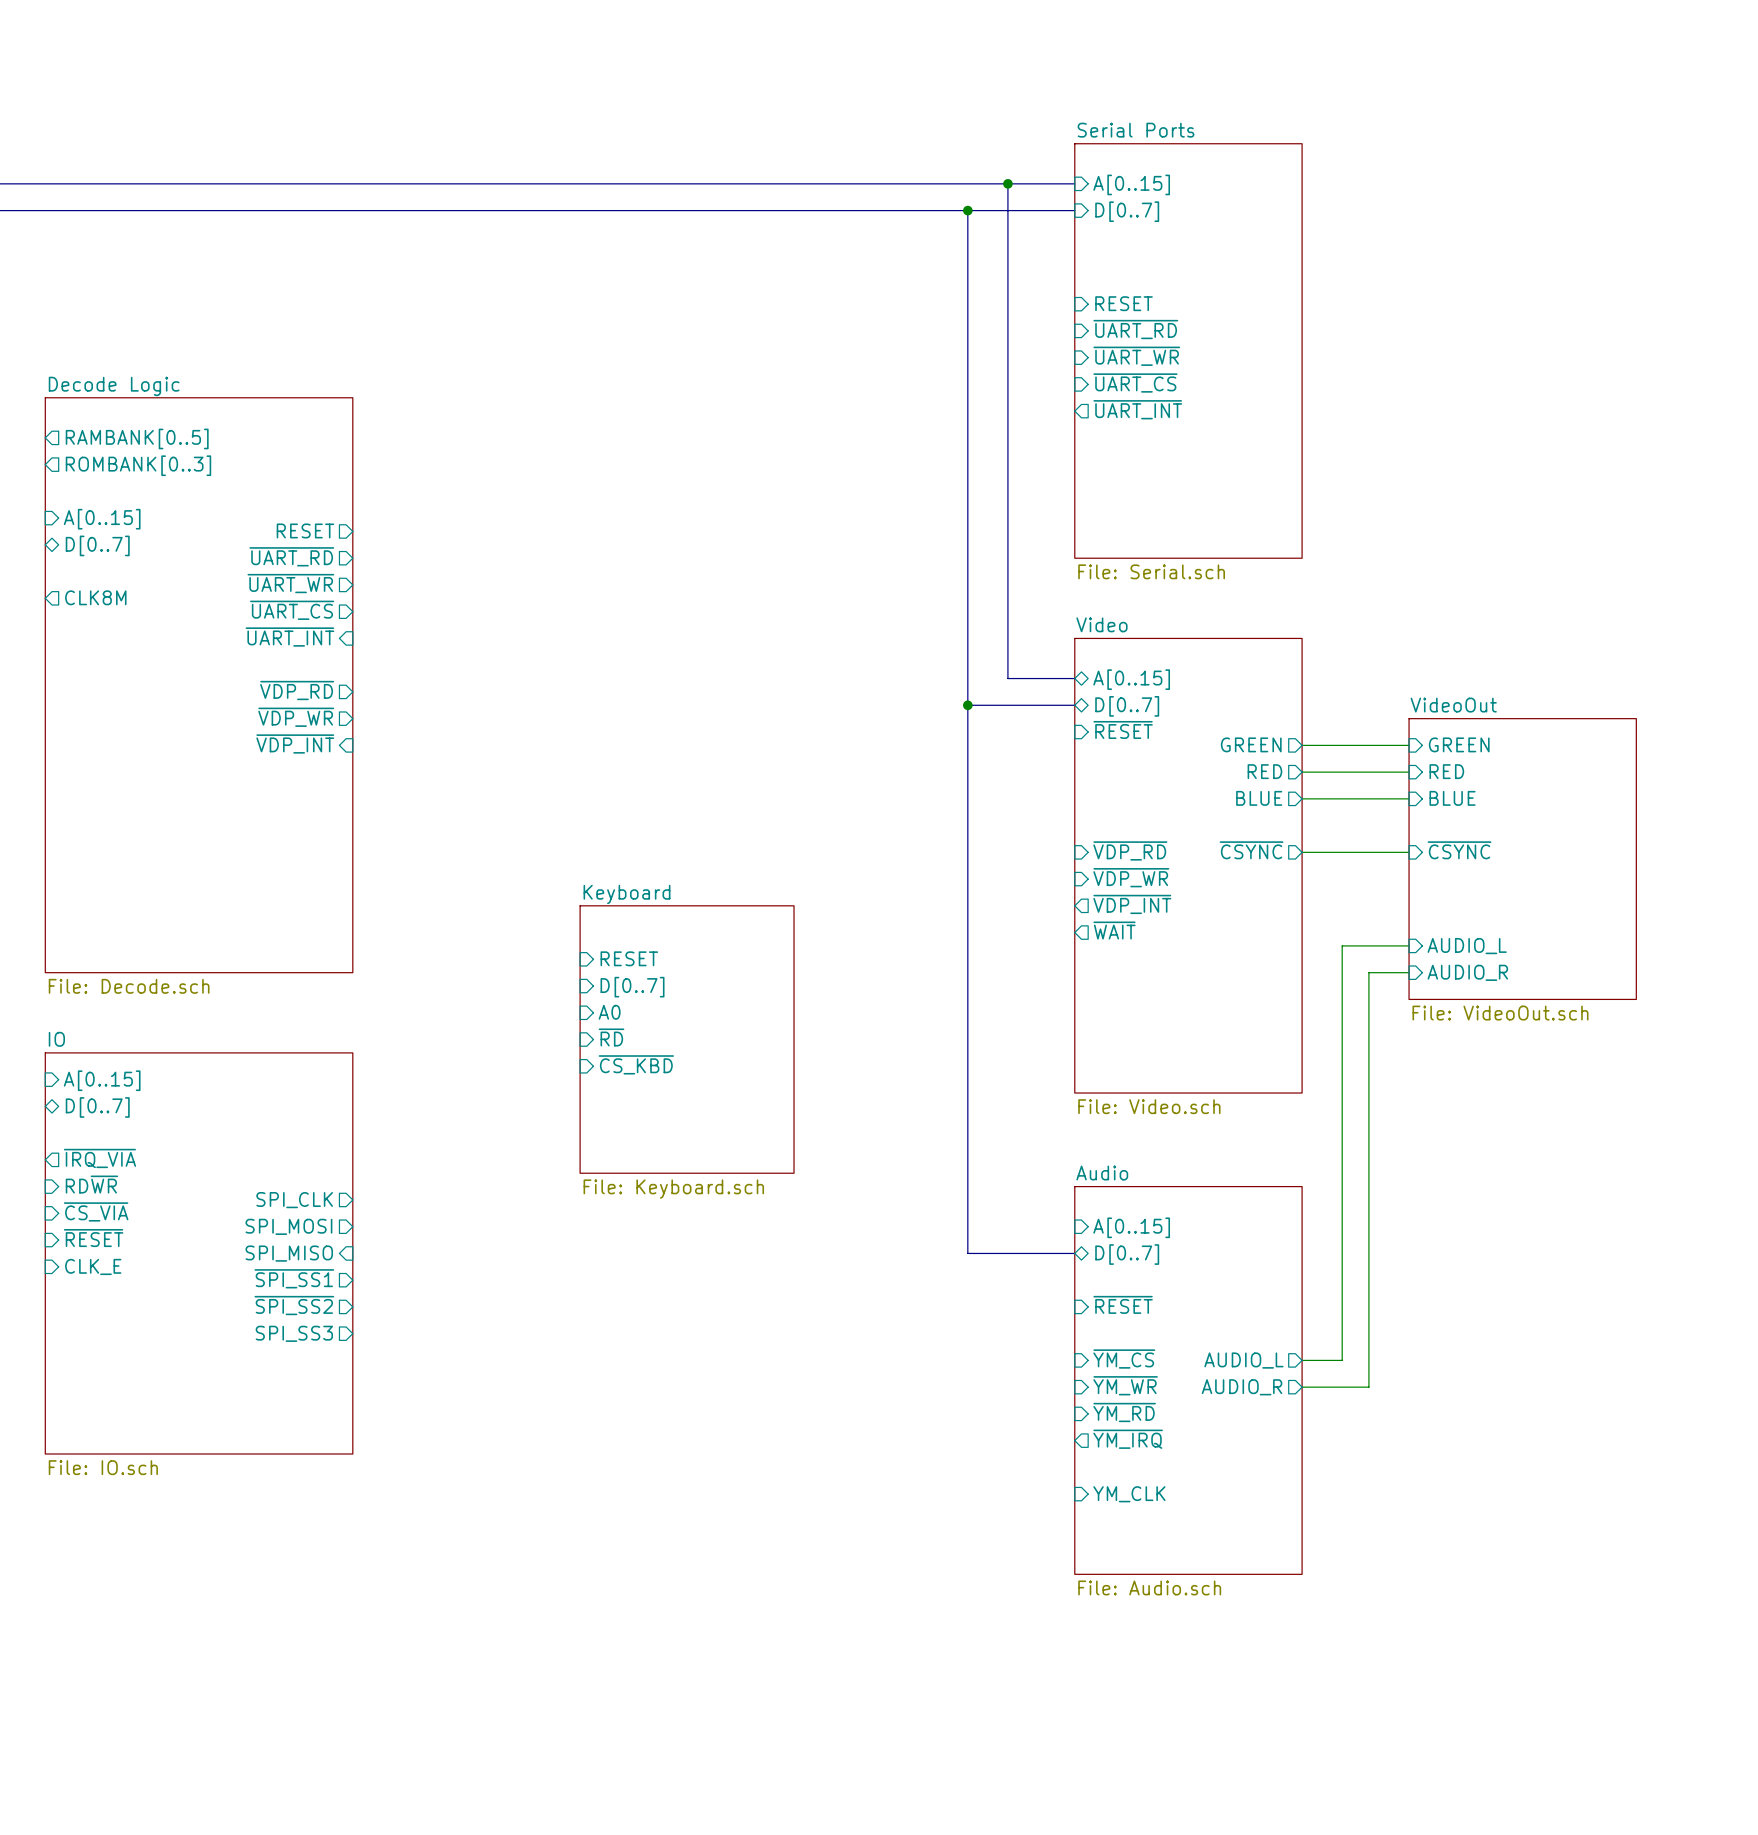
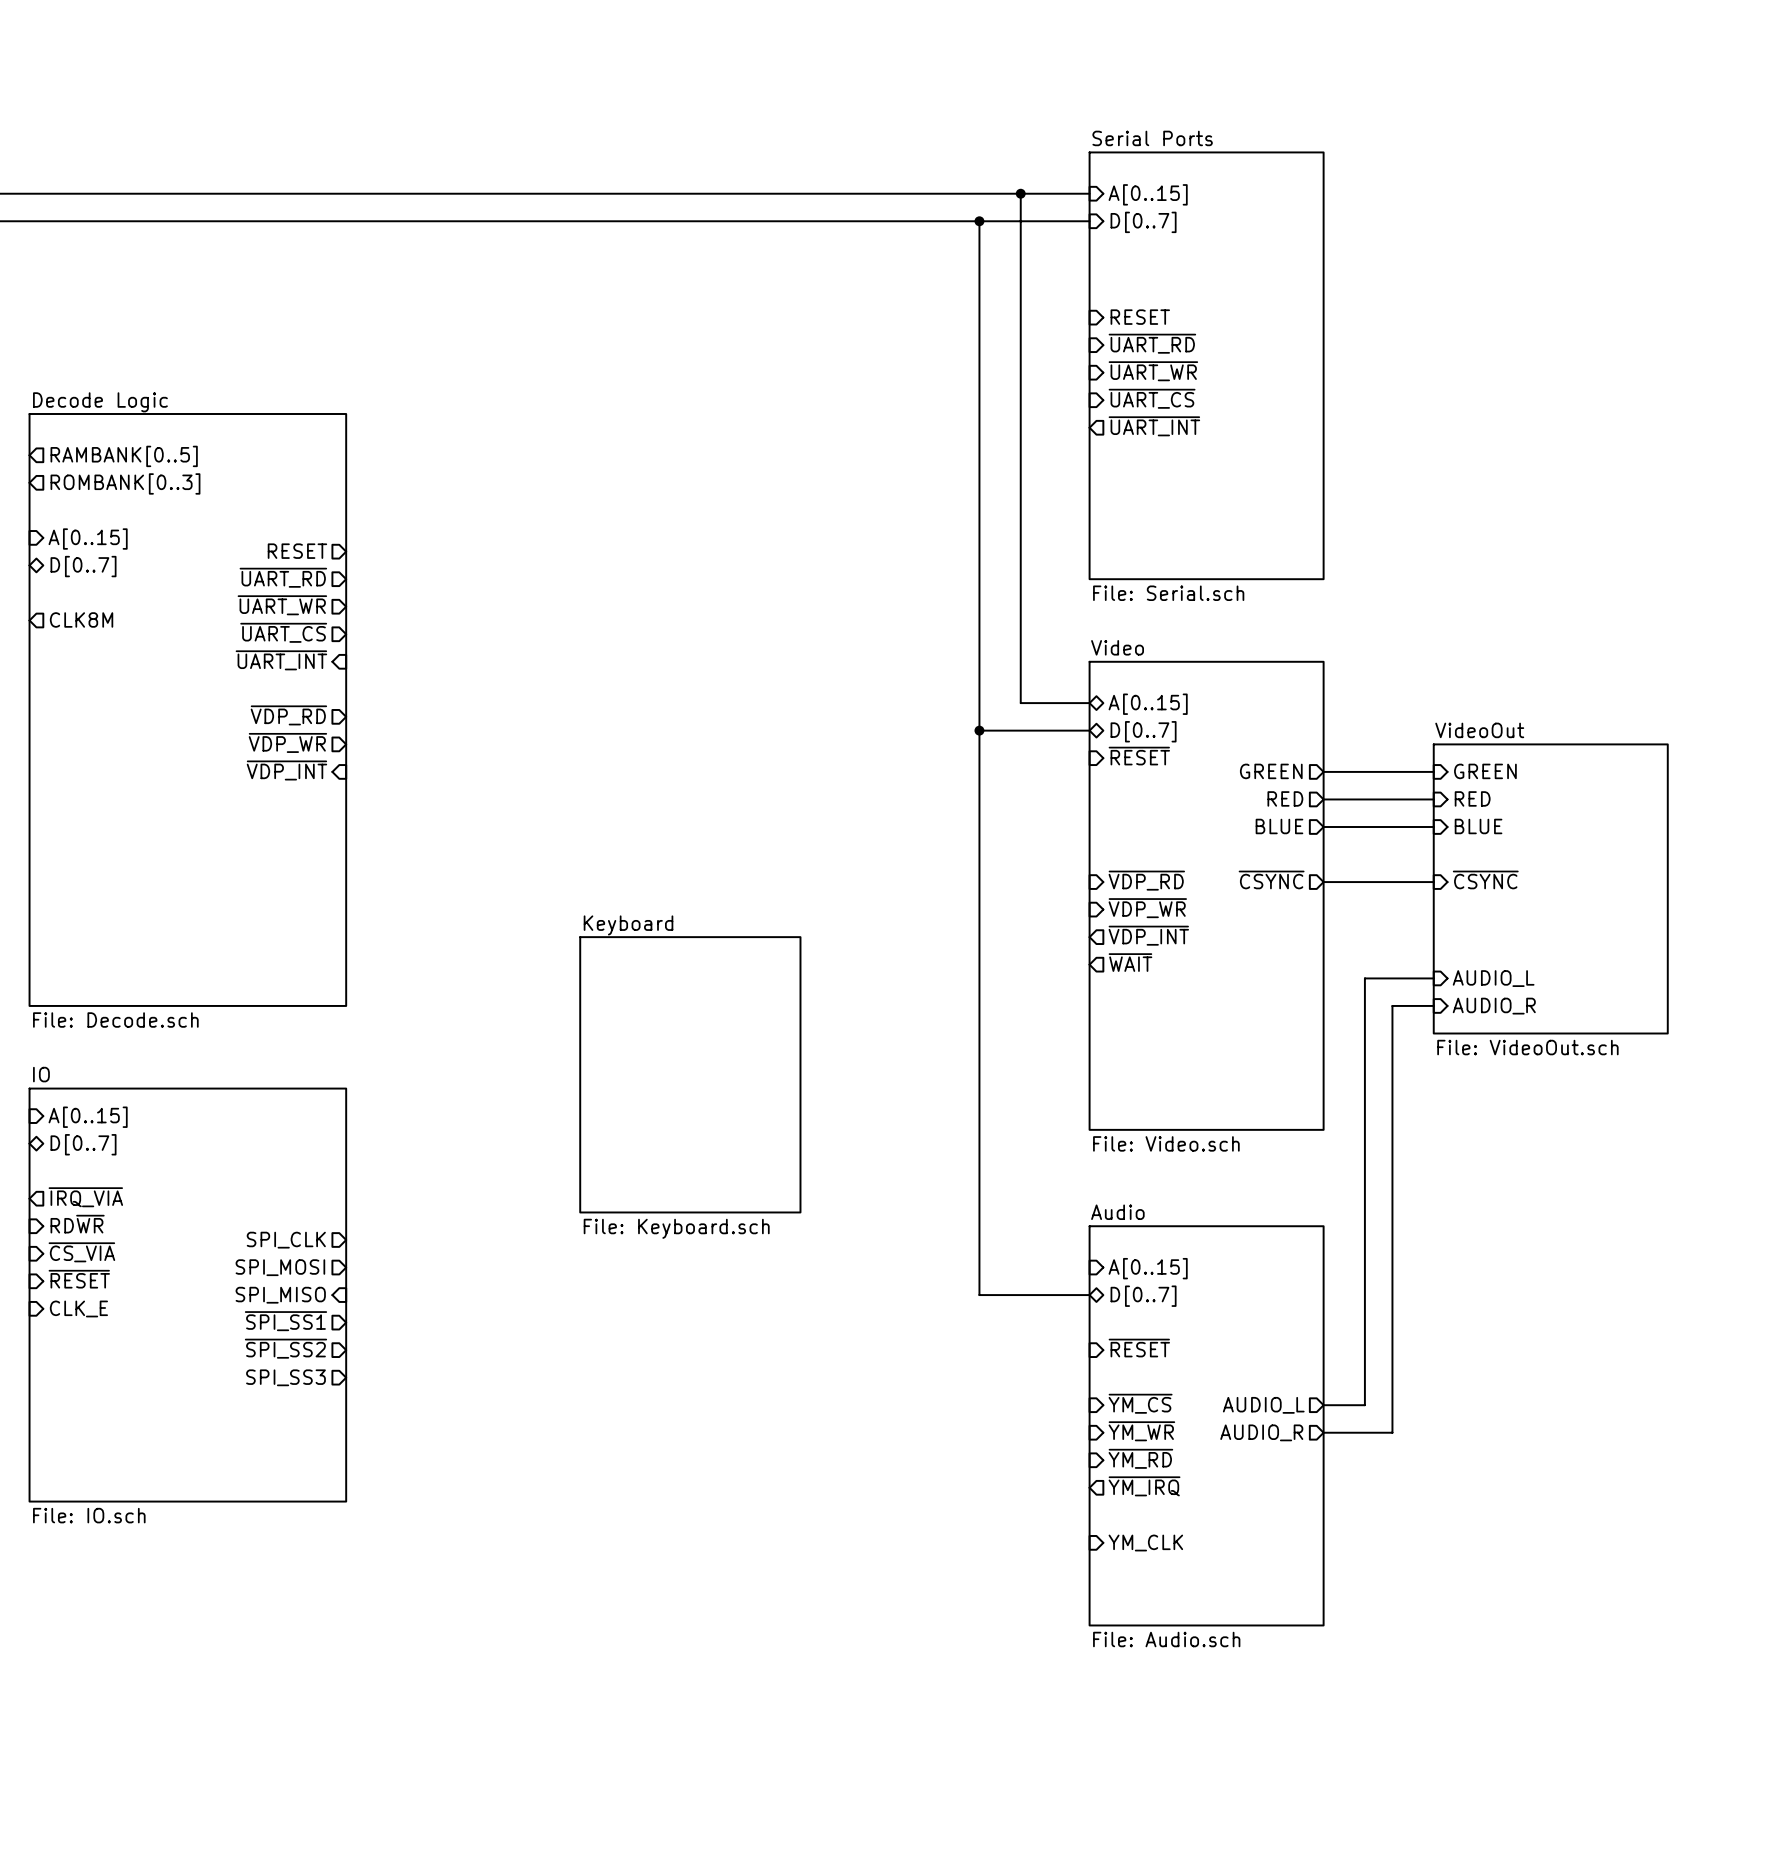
sheet pin: RESET (629, 958) -> none
sheet pin: D[0..7] (632, 987) -> none
sheet pin: A0 (609, 1012) -> none
sheet pin: ~{RD} (611, 1037) -> none
sheet pin: ~{CS_KBD} (636, 1064) -> none

